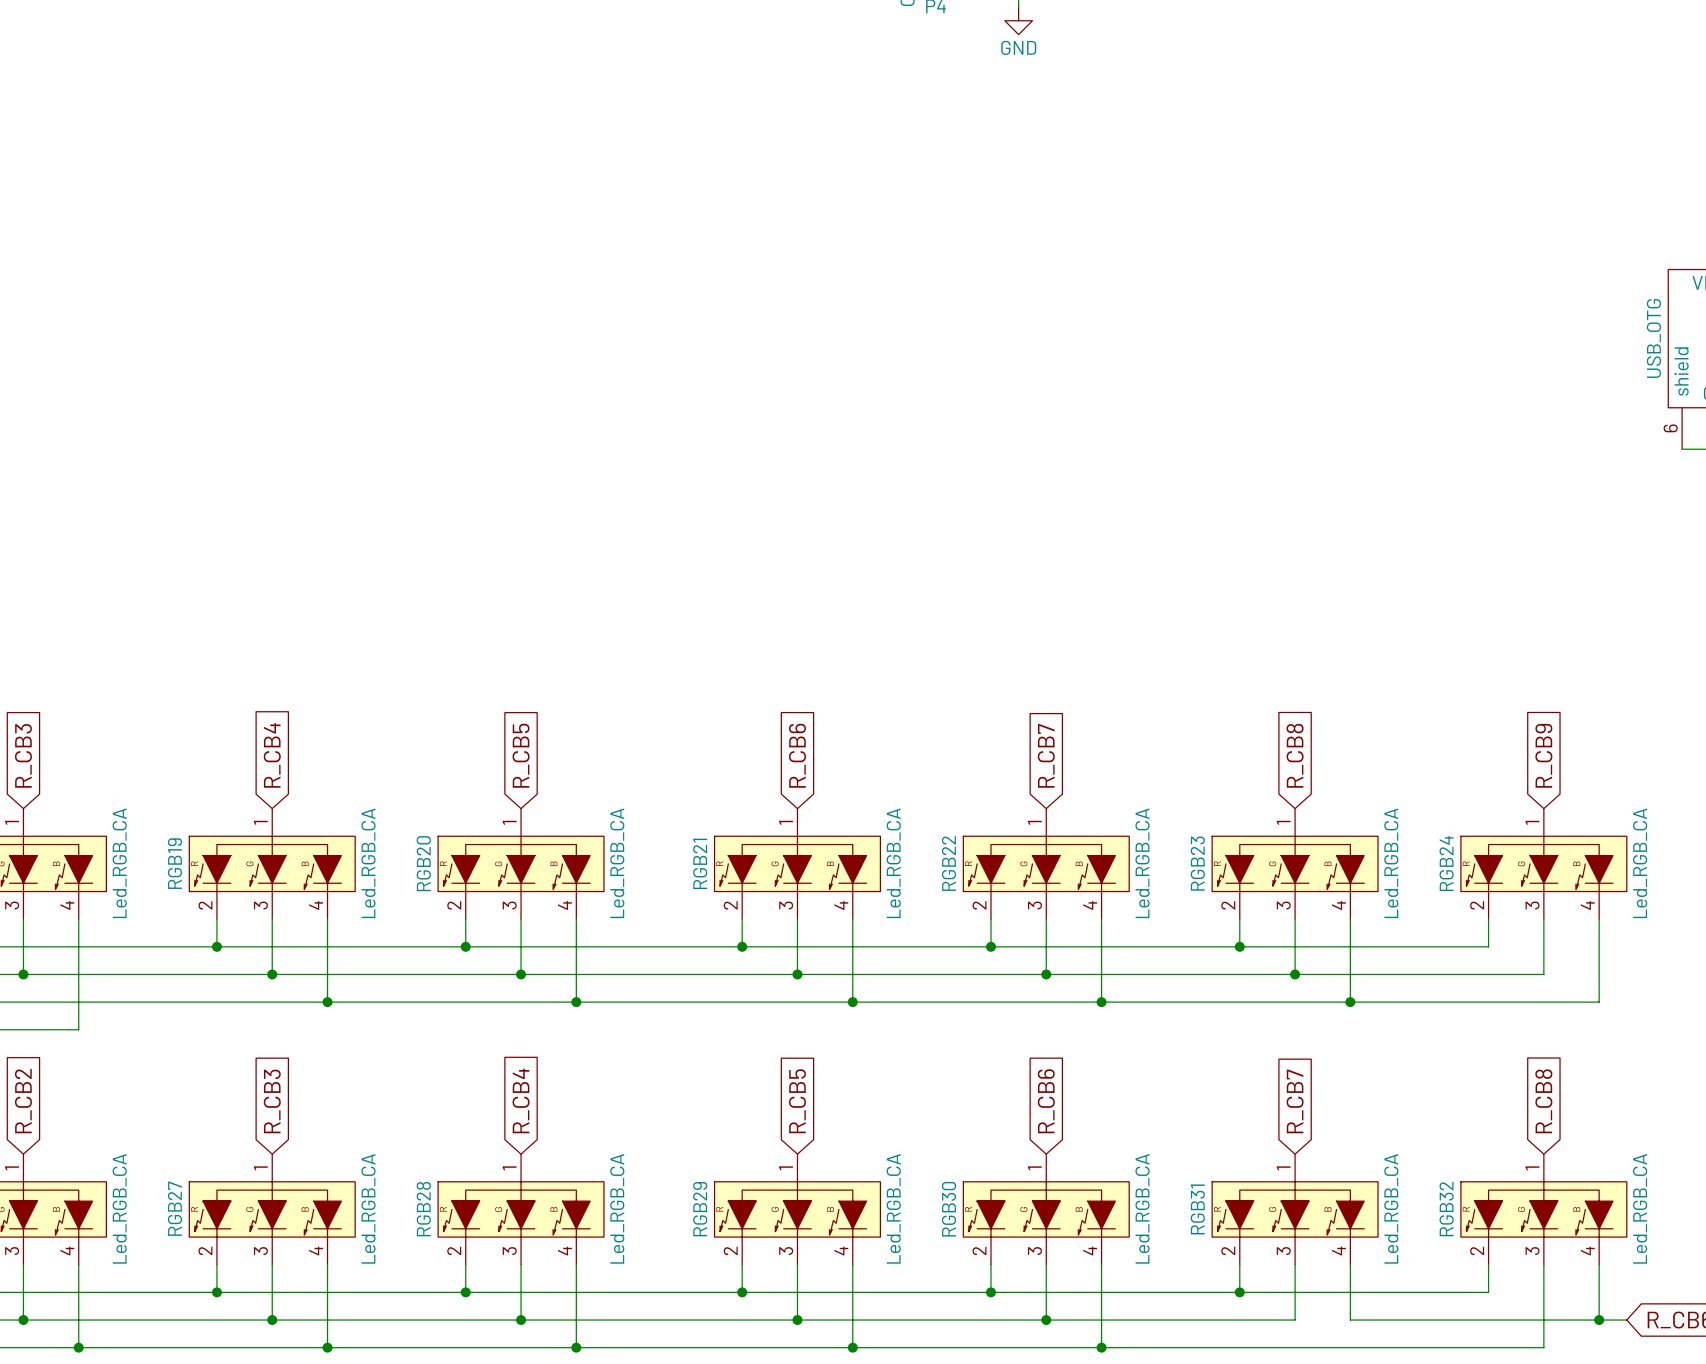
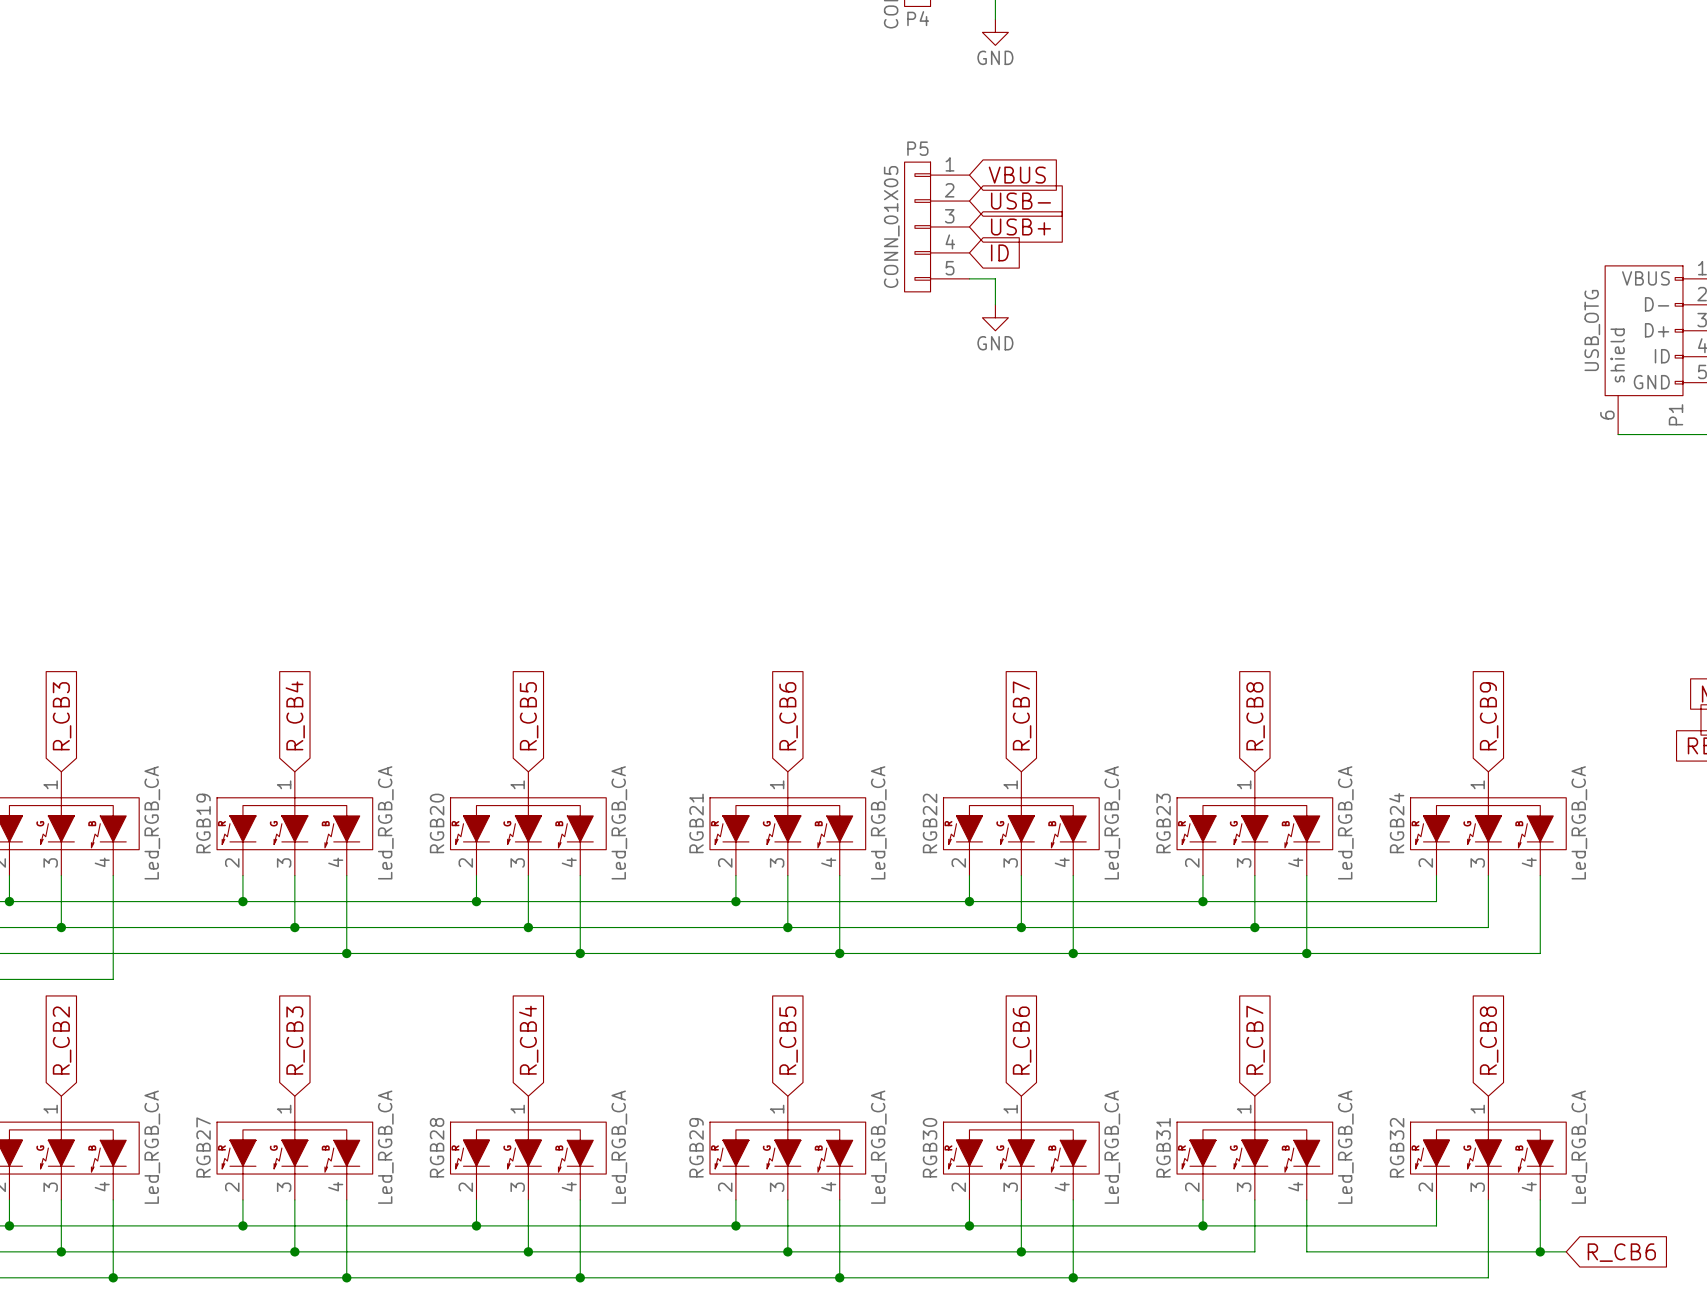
global label: none -> VBUS (1017, 175)
global label: none -> USB- (1020, 201)
P5: none -> CONN_01X05 (937, 226)
global label: none -> USB+ (1020, 226)
global label: none -> ID (999, 252)
wire: none -> (969, 278) (995, 278) (995, 304)
power symbol: none -> GND (995, 317)

